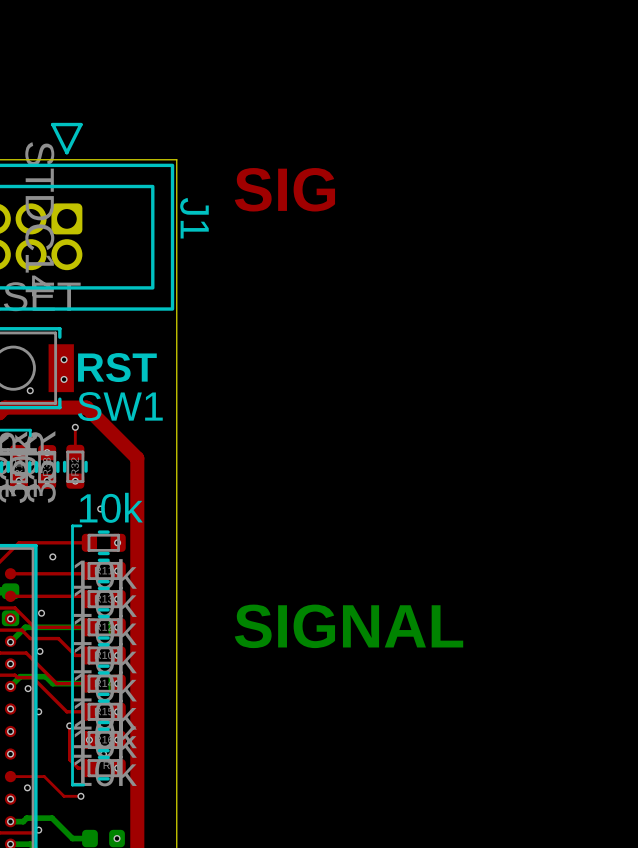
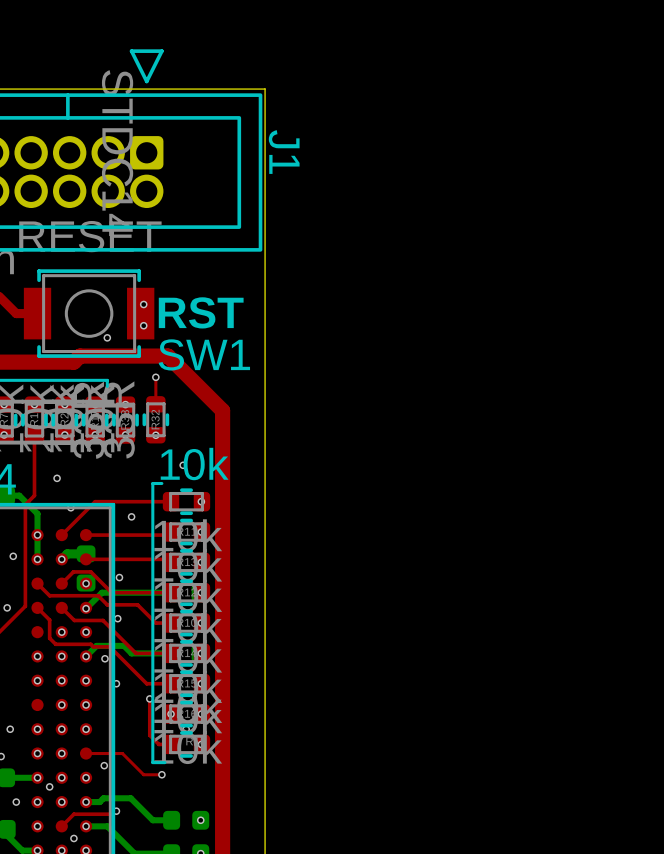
text: SIG (284, 189) -> none
text: SIGNAL (349, 626) -> none

